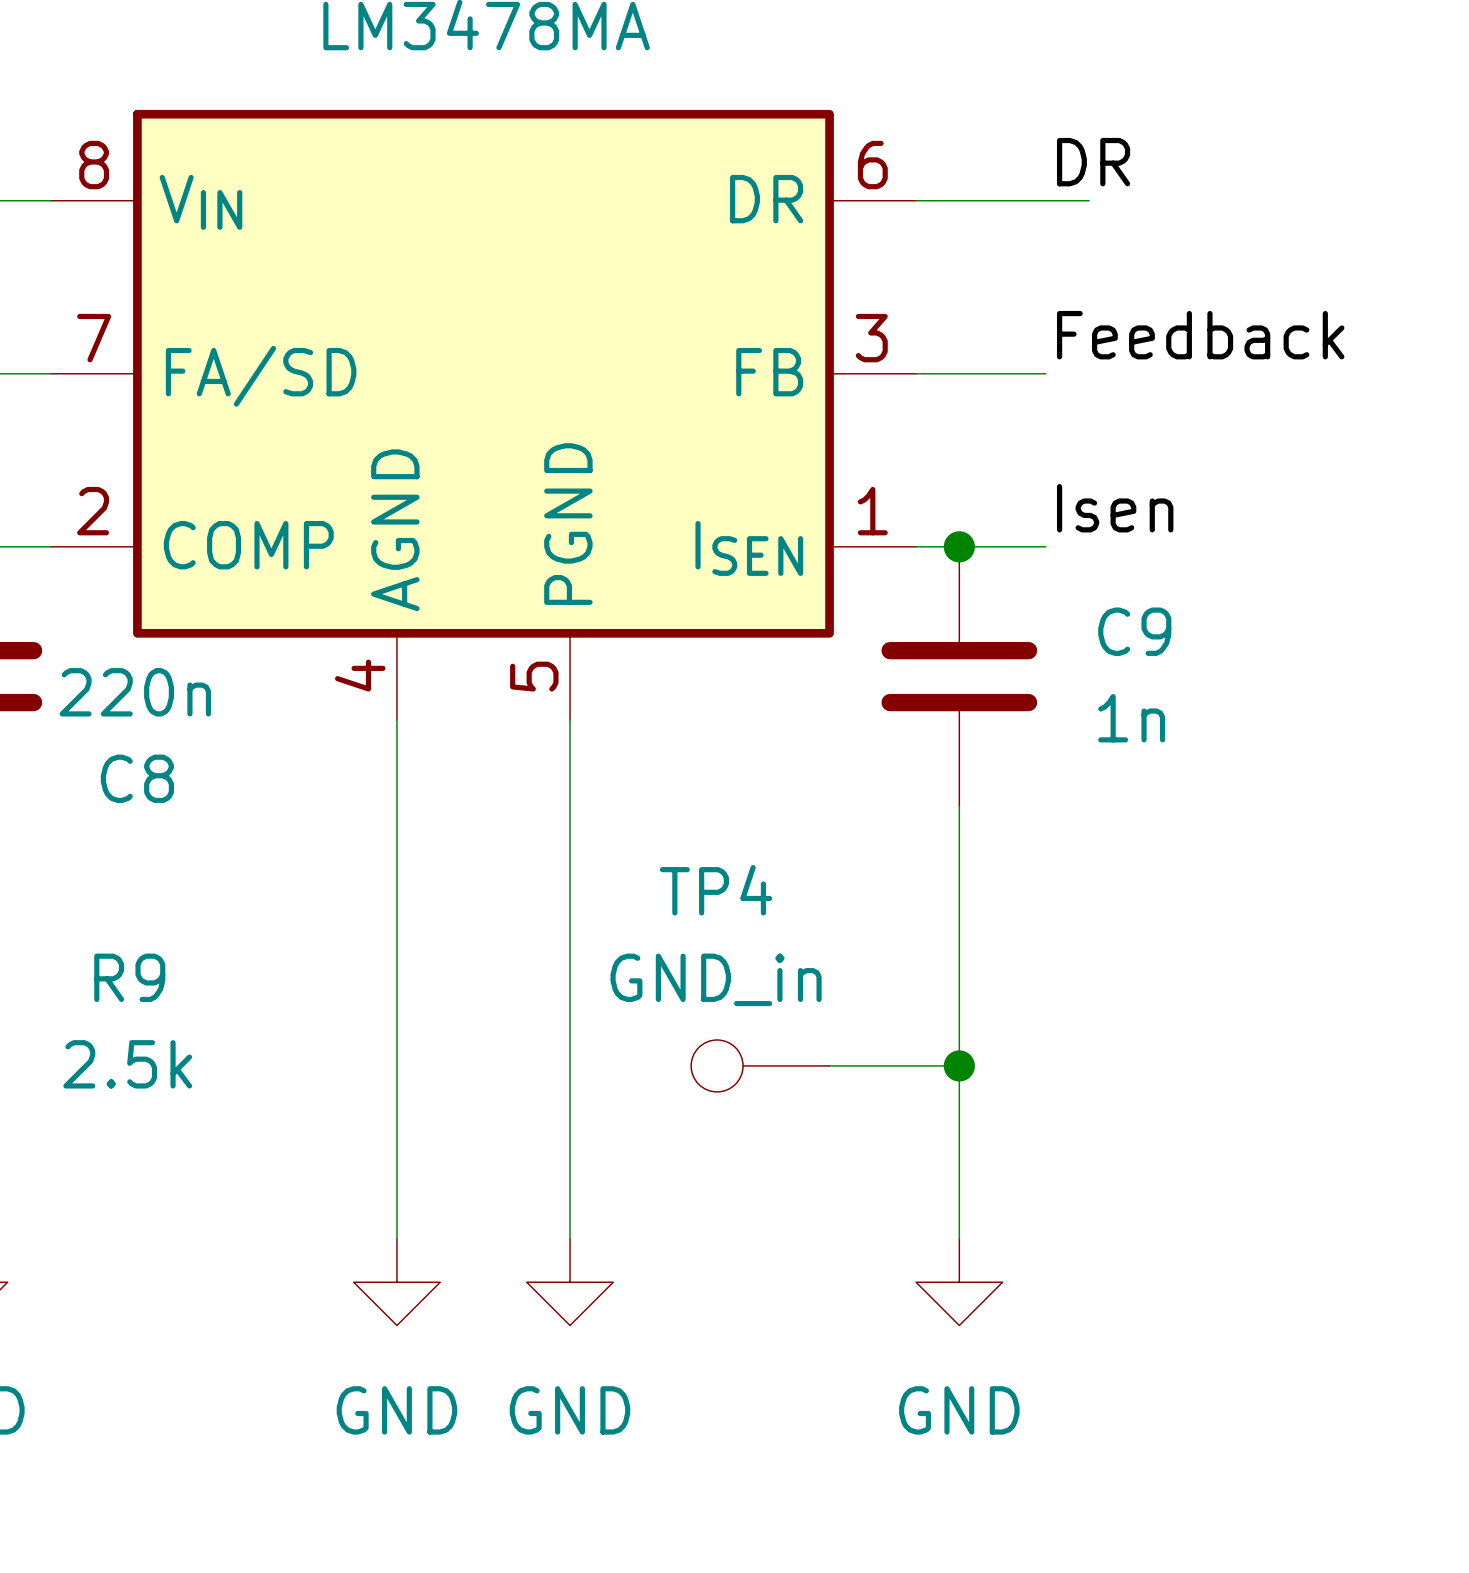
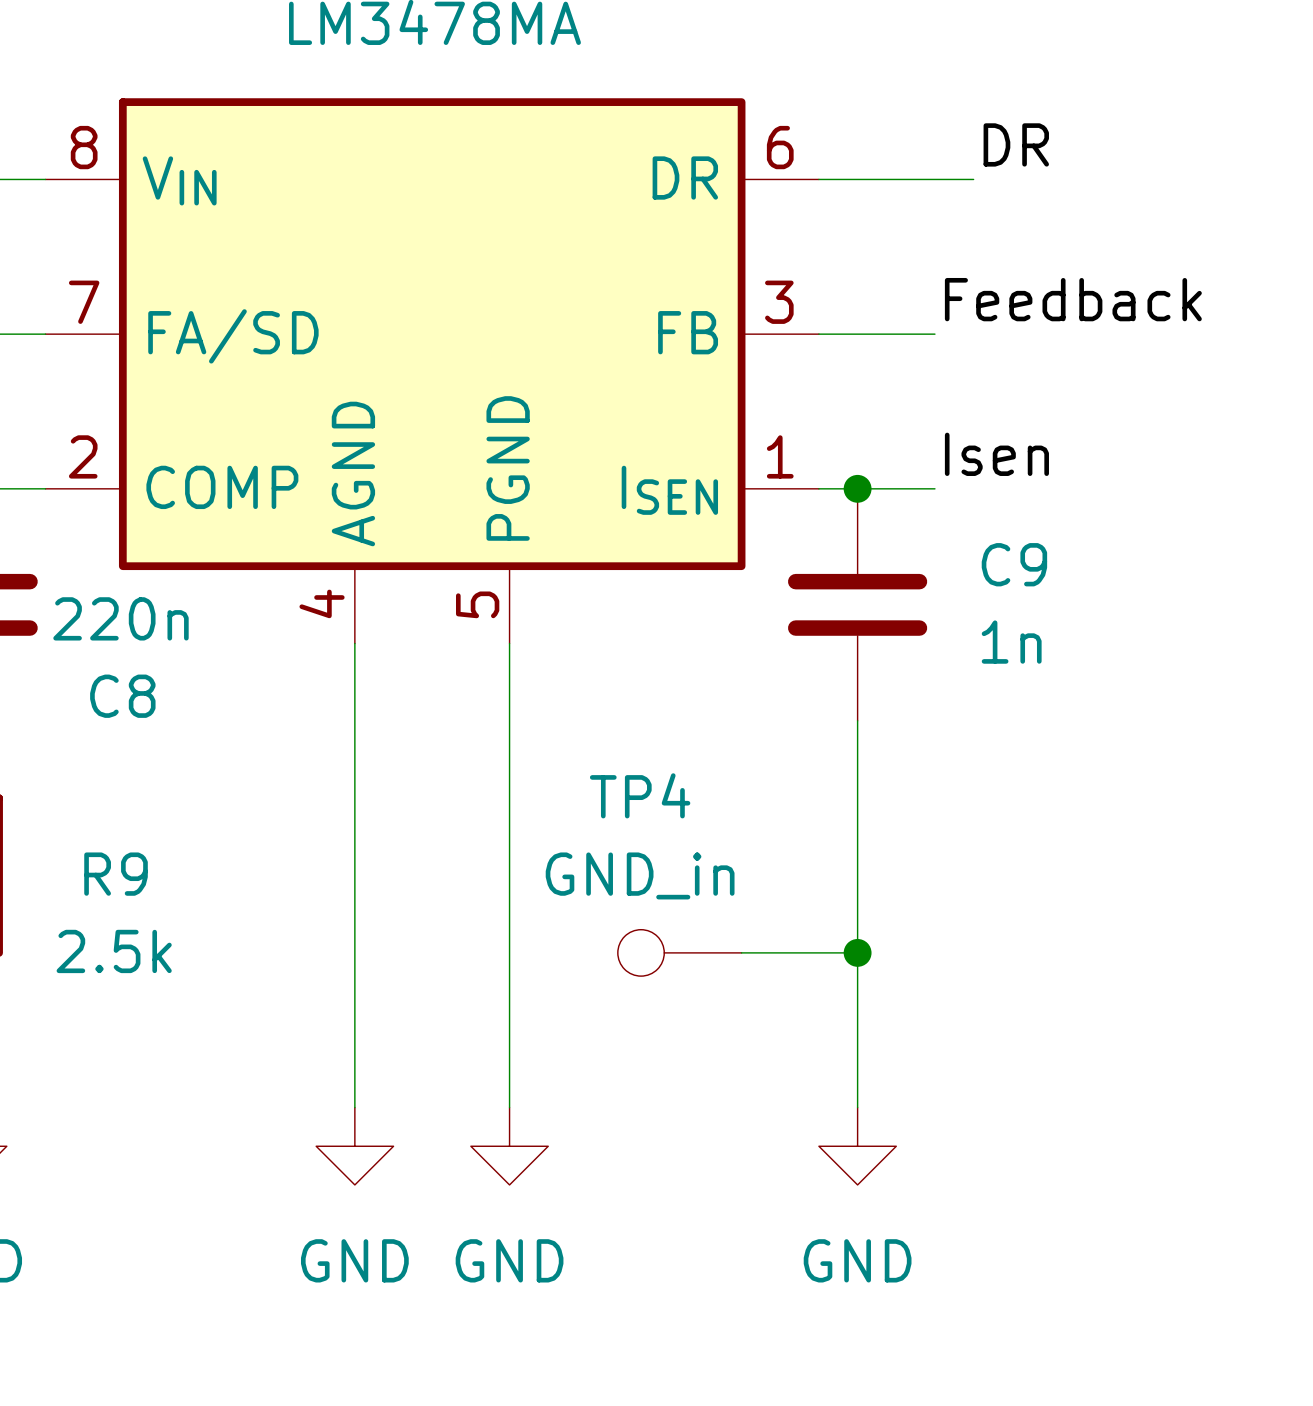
label position: DR (1093, 162) -> DR (1016, 144)

